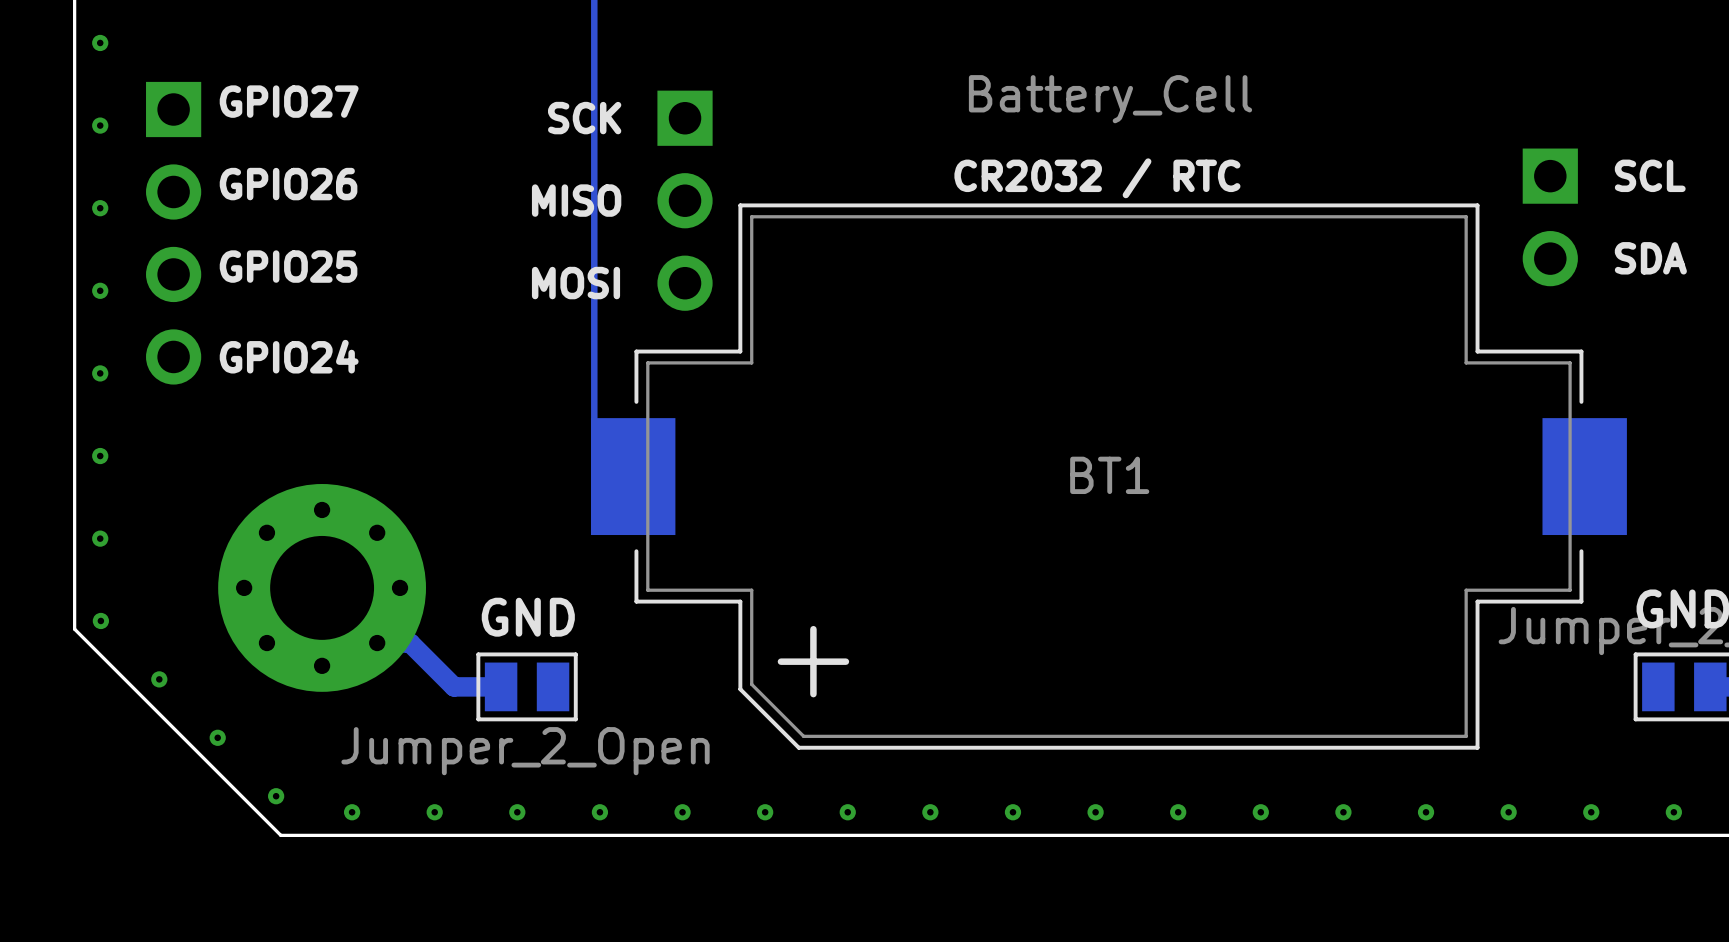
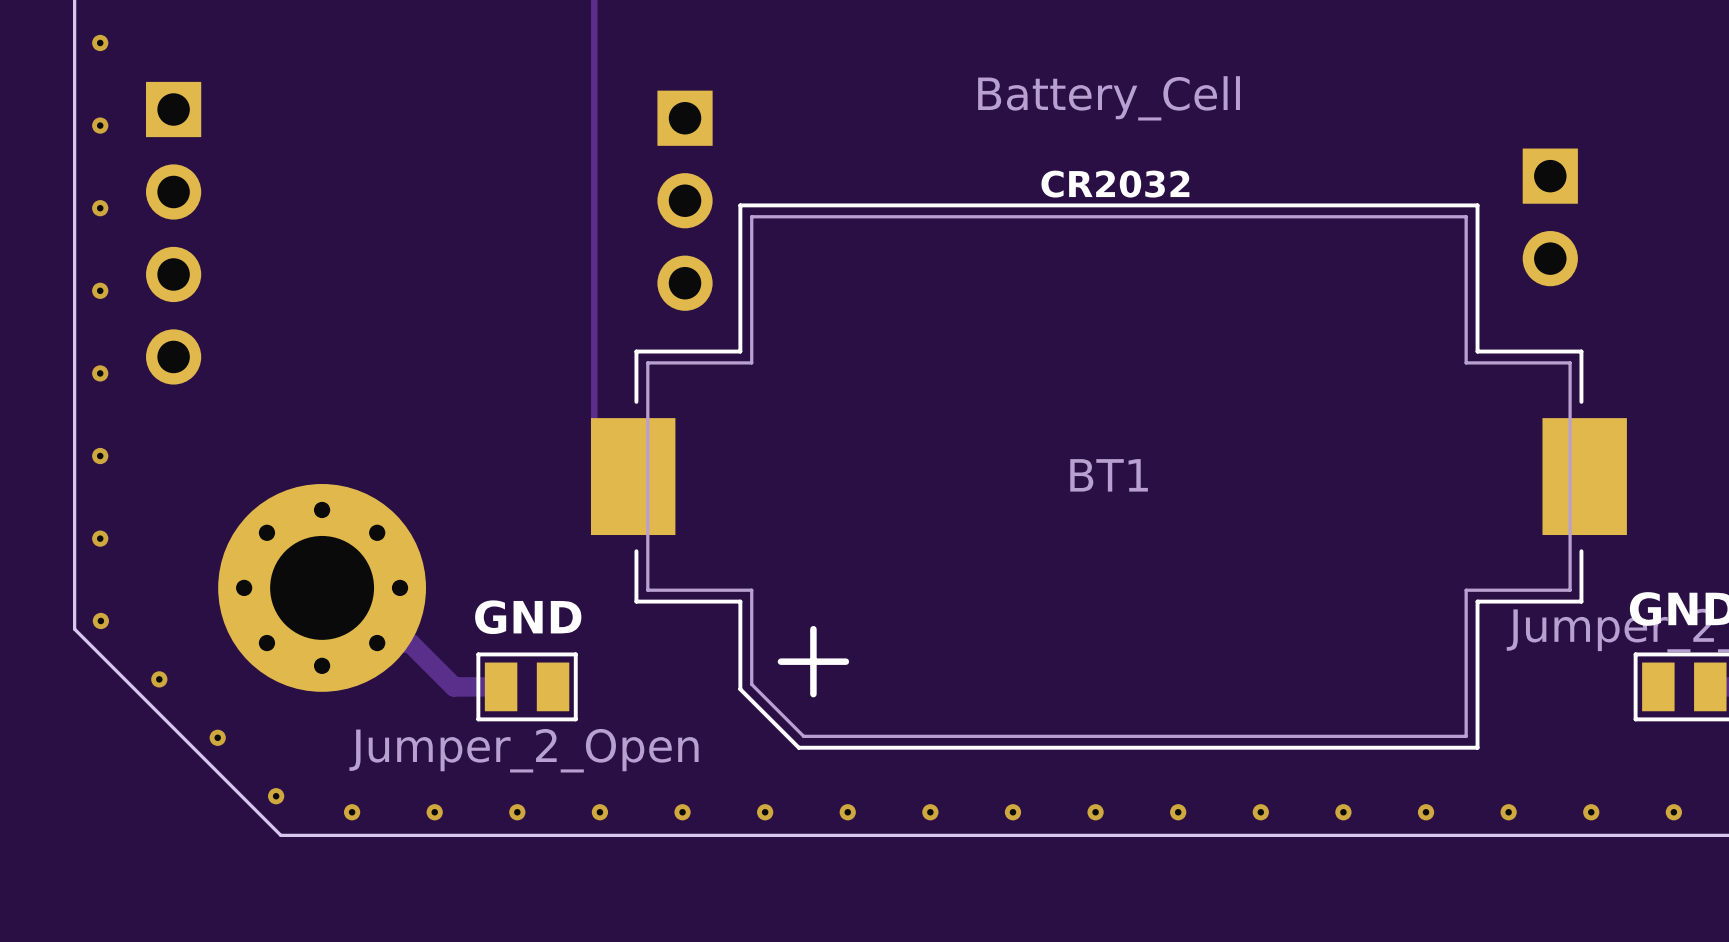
text: GPIO27 (289, 101) -> none
text: SCK (584, 118) -> none
text: SCL (1650, 175) -> none
text: CR2032 / RTC (1097, 178) -> CR2032 (1115, 184)
text: GPIO26 (288, 184) -> none
text: MISO (576, 200) -> none
text: SDA (1650, 258) -> none
text: GPIO25 (288, 266) -> none
text: MOSI (576, 283) -> none
text: GPIO24 (289, 356) -> none

